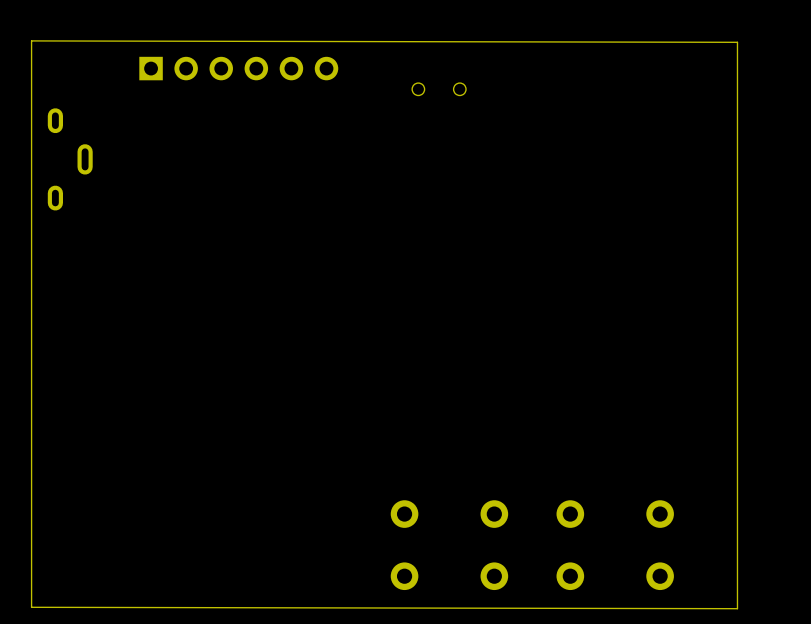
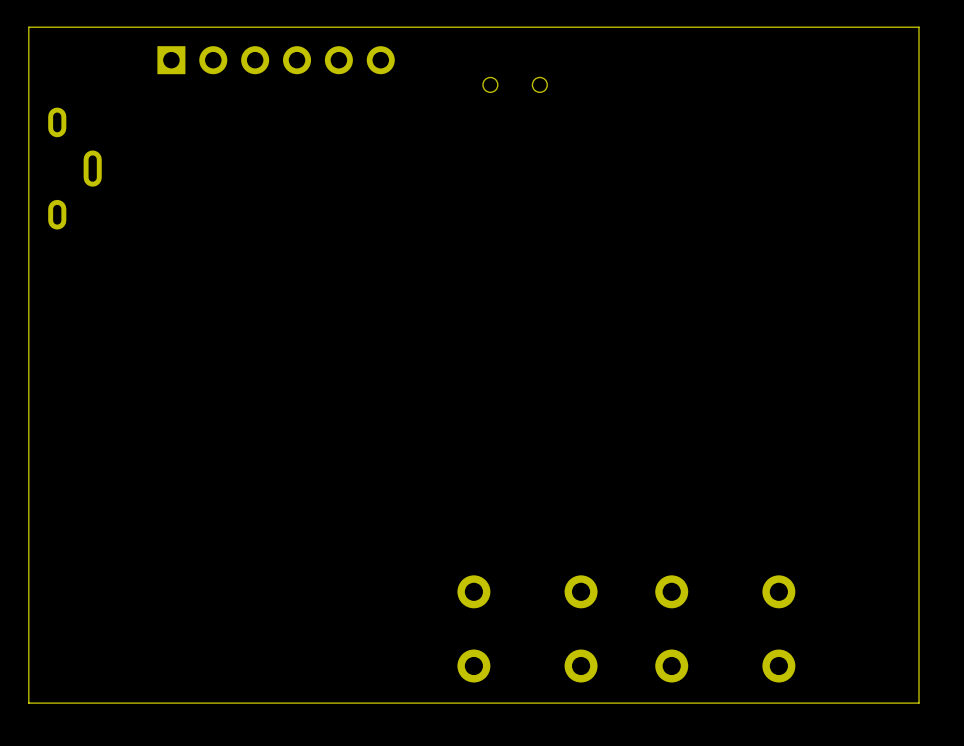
board edge: (31, 40) (737, 42) (737, 608) (31, 607) -> (28, 27) (919, 27) (919, 703) (28, 703)

